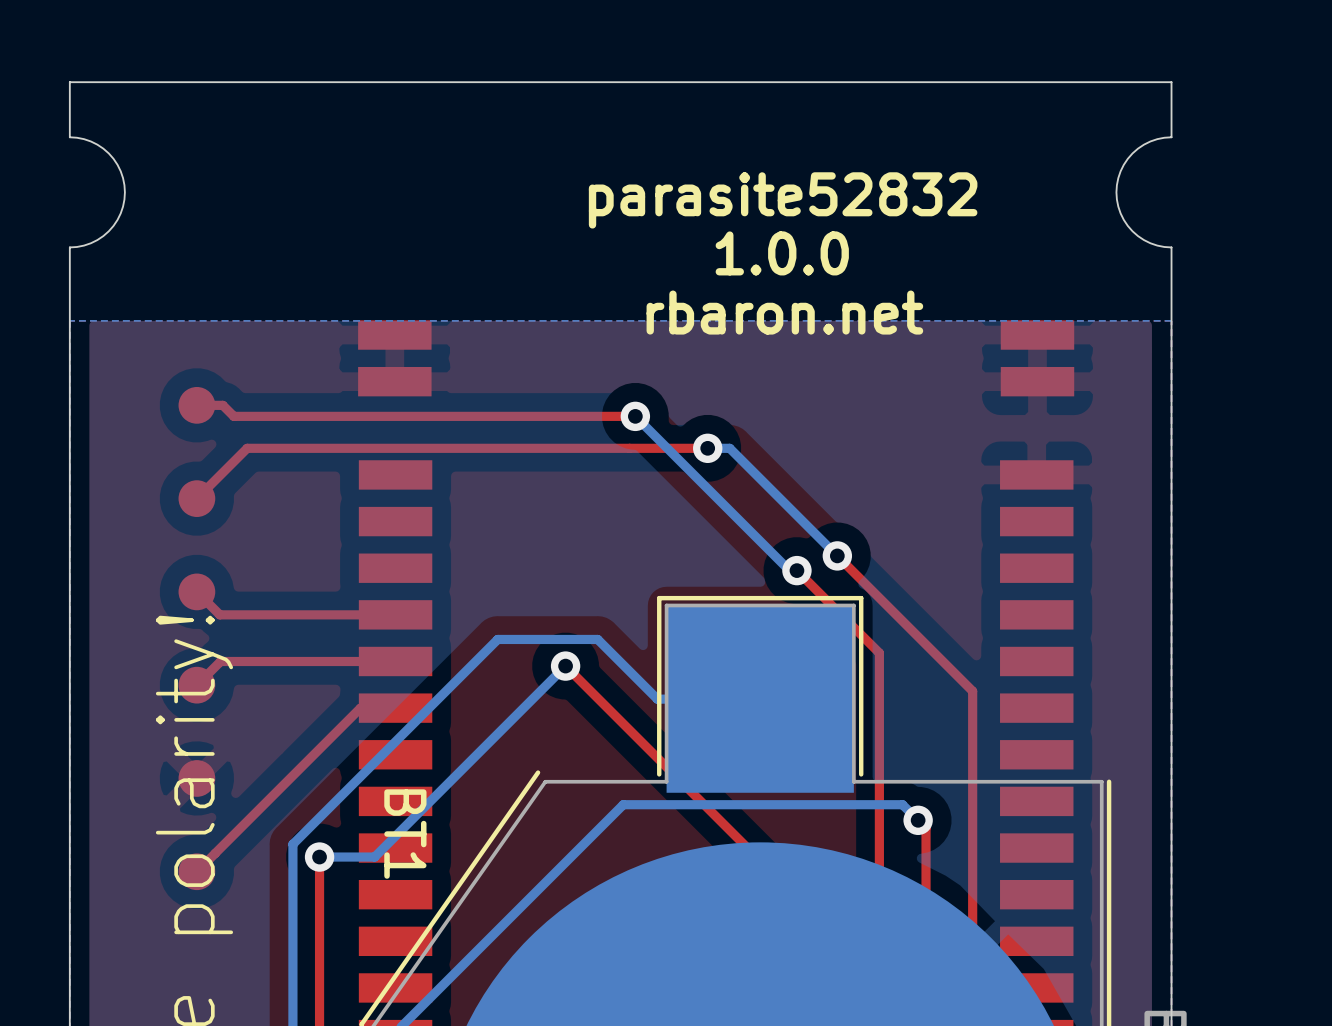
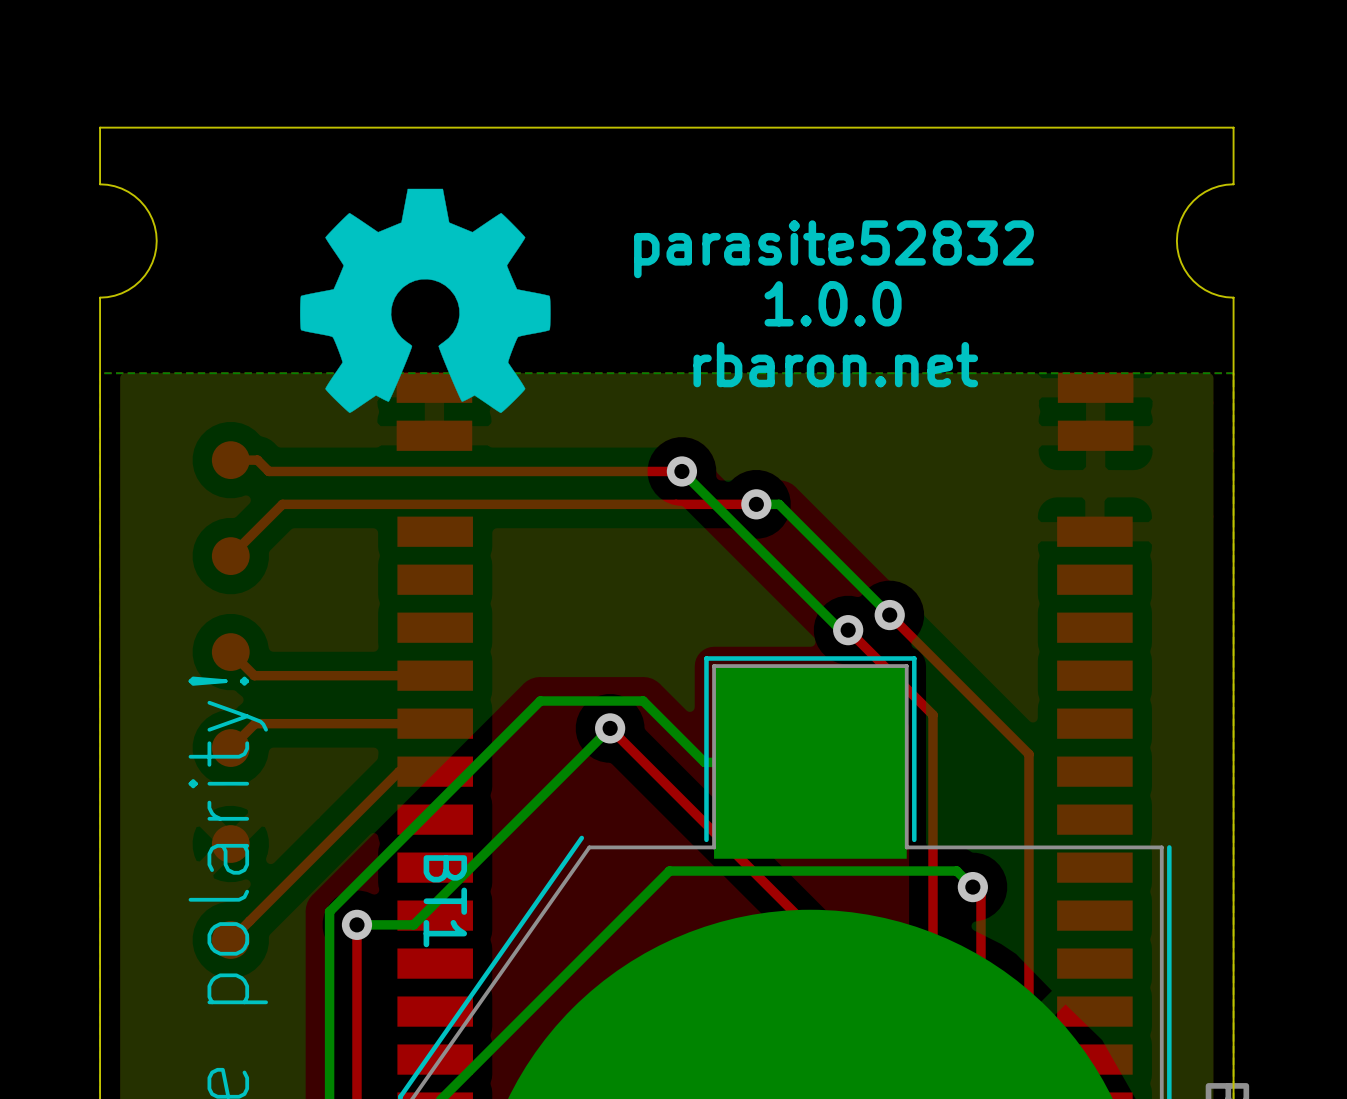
drawing: none -> [300, 188, 551, 414]

